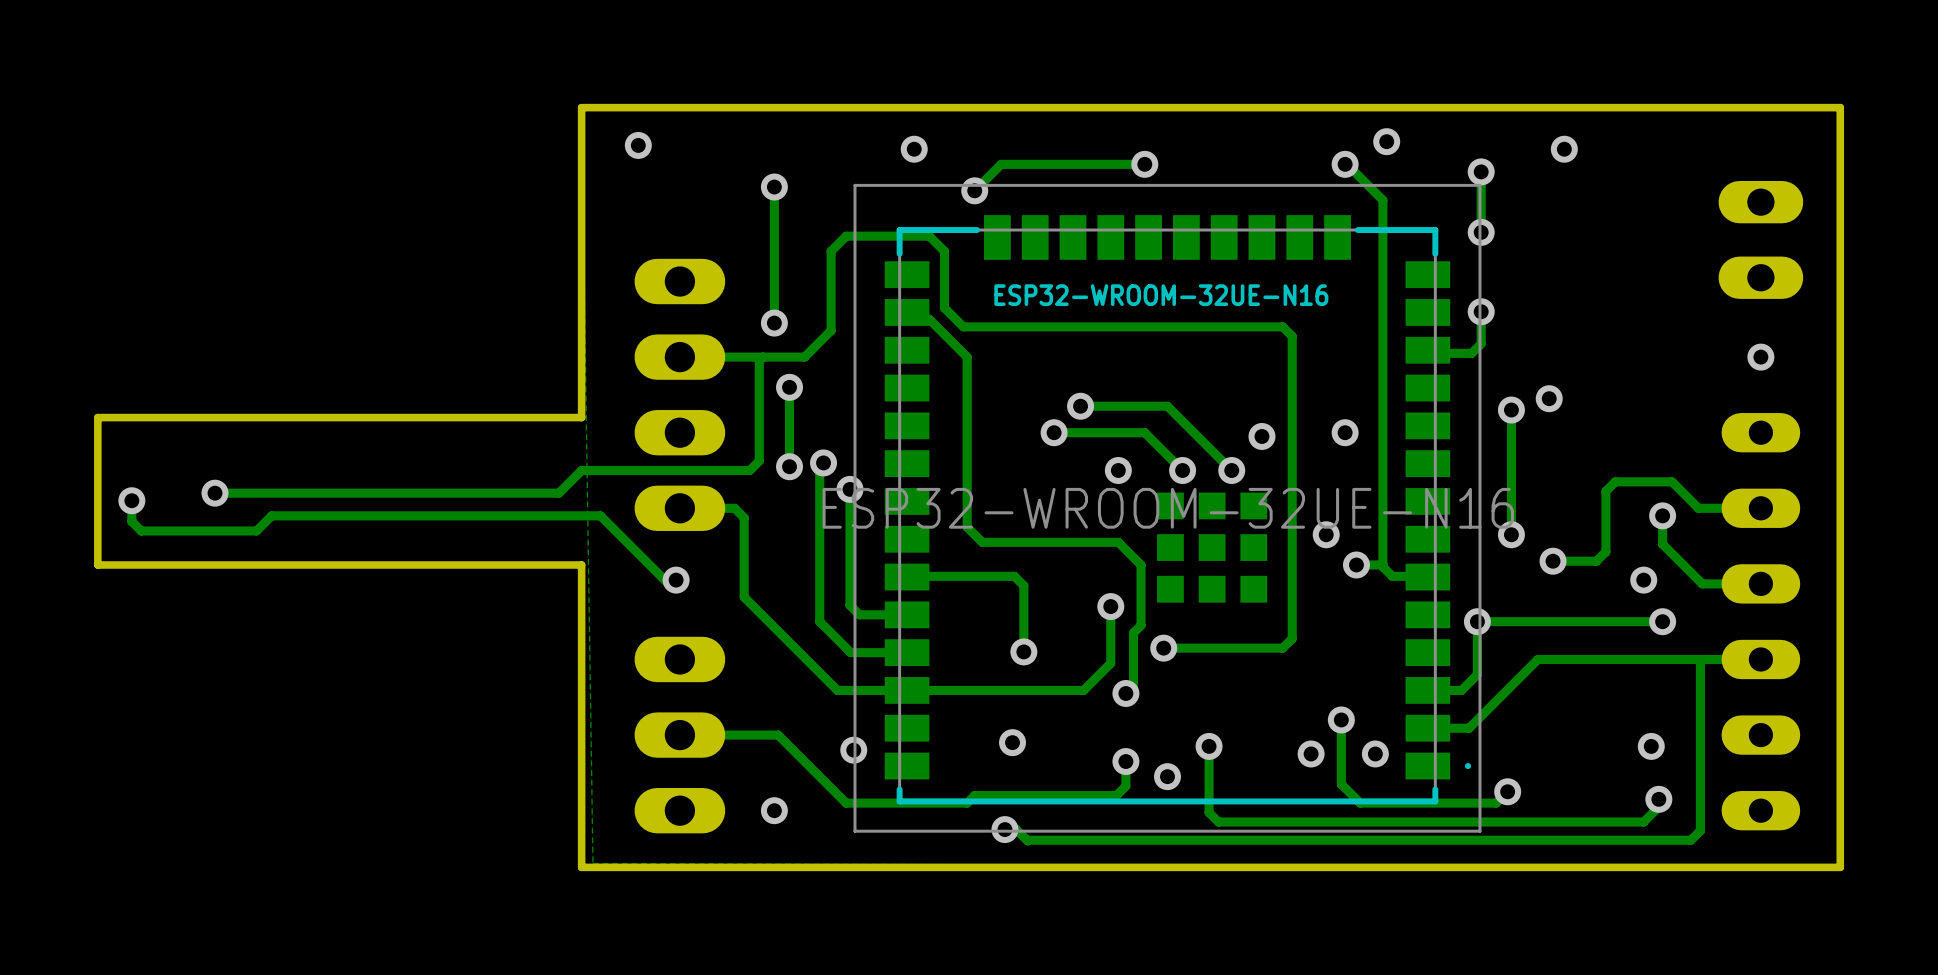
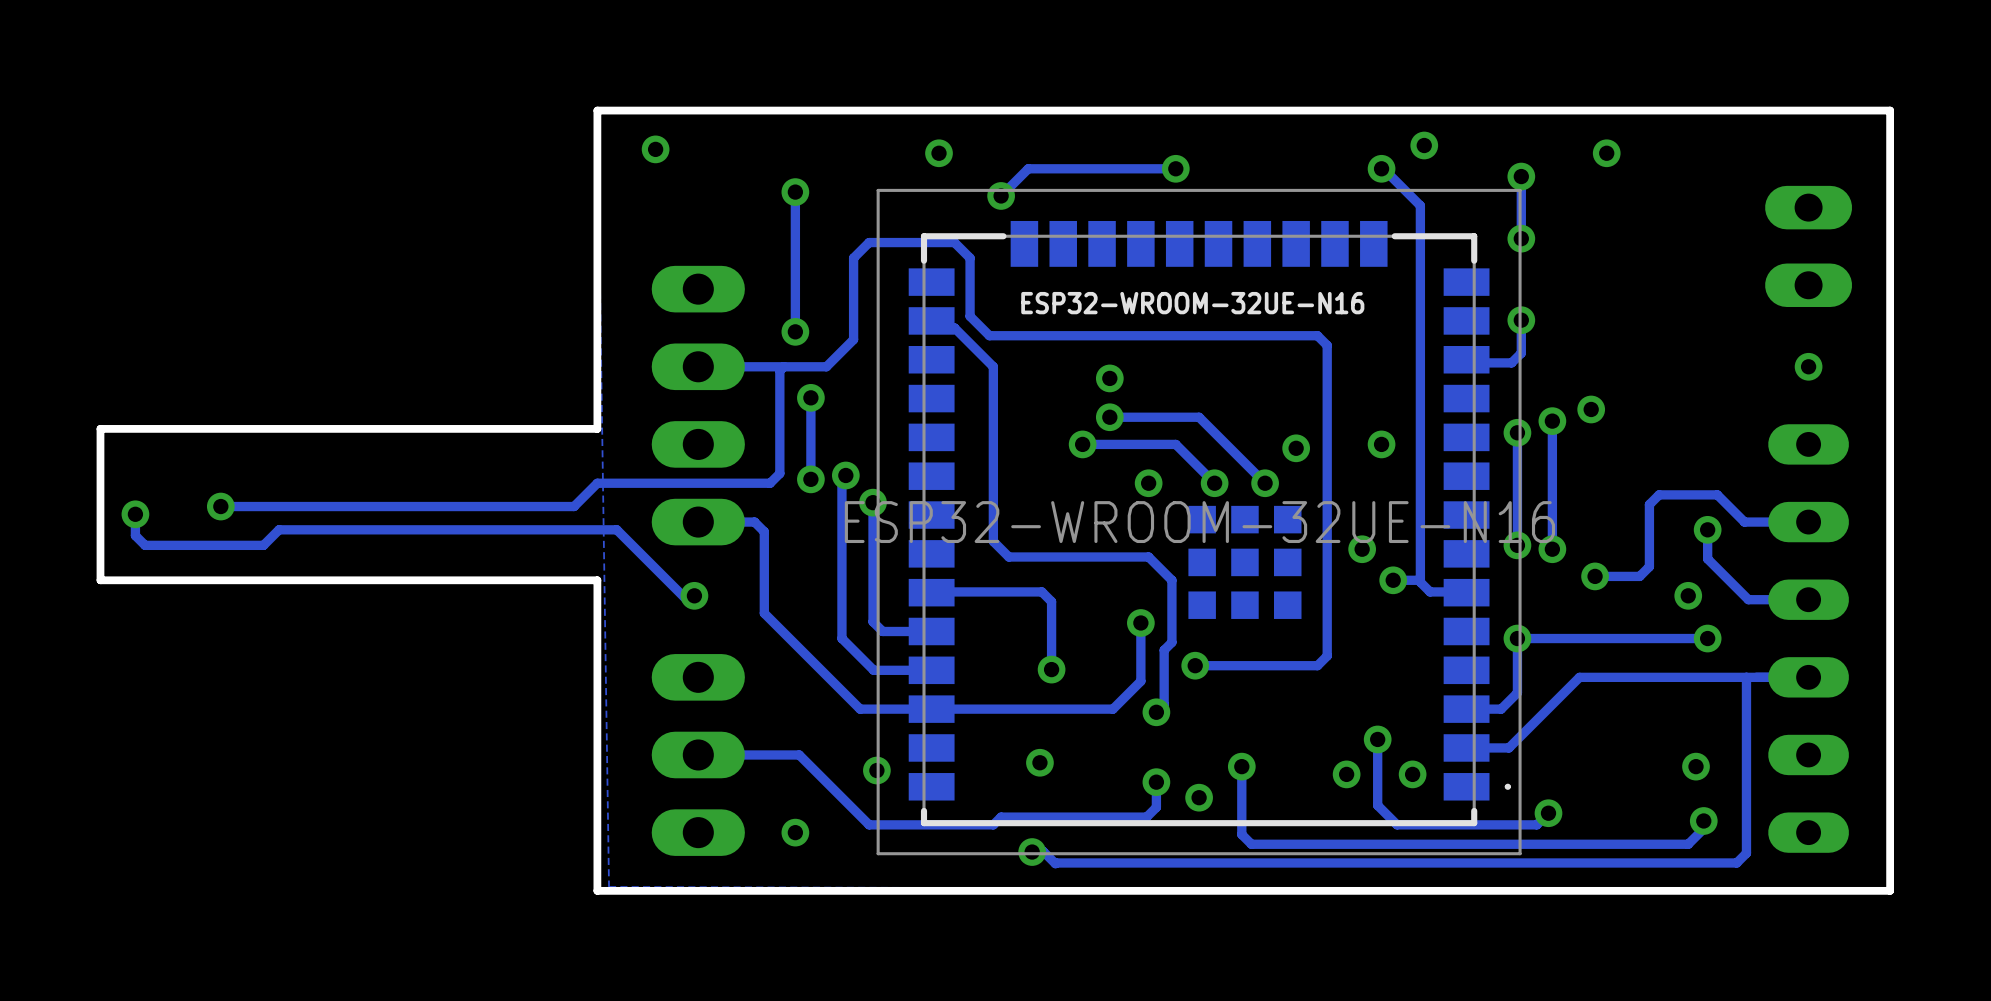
via: none -> (1109, 378)
track: none -> (1517, 432) (1517, 545)
via: none -> (1517, 432)
via: none -> (1517, 545)

